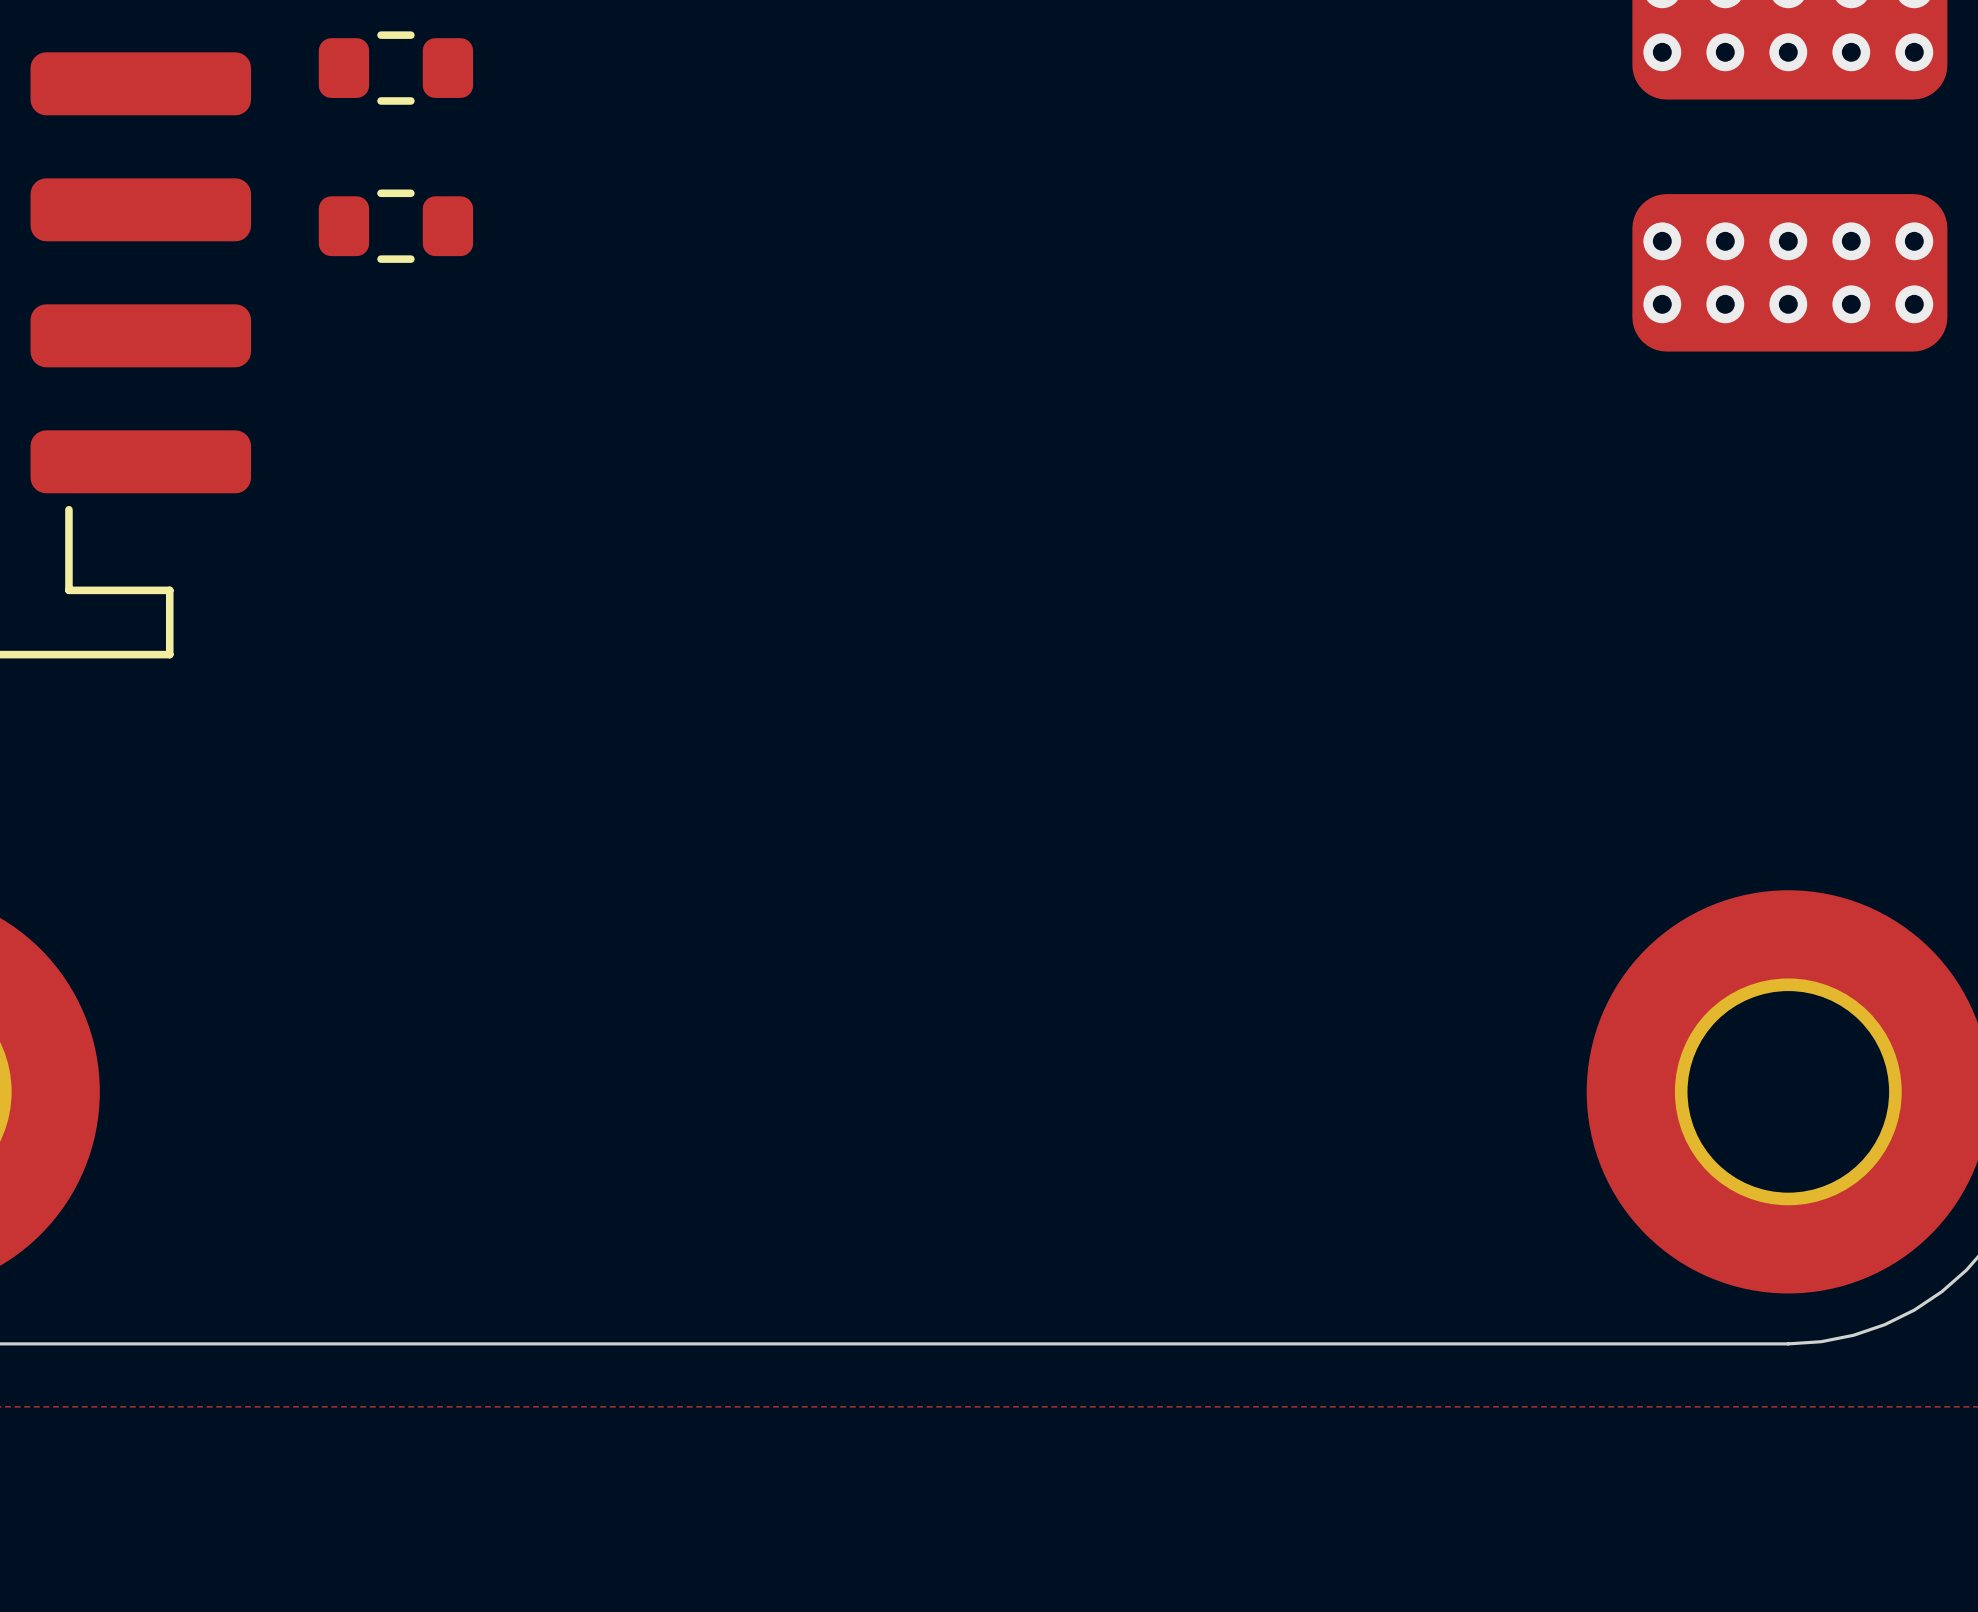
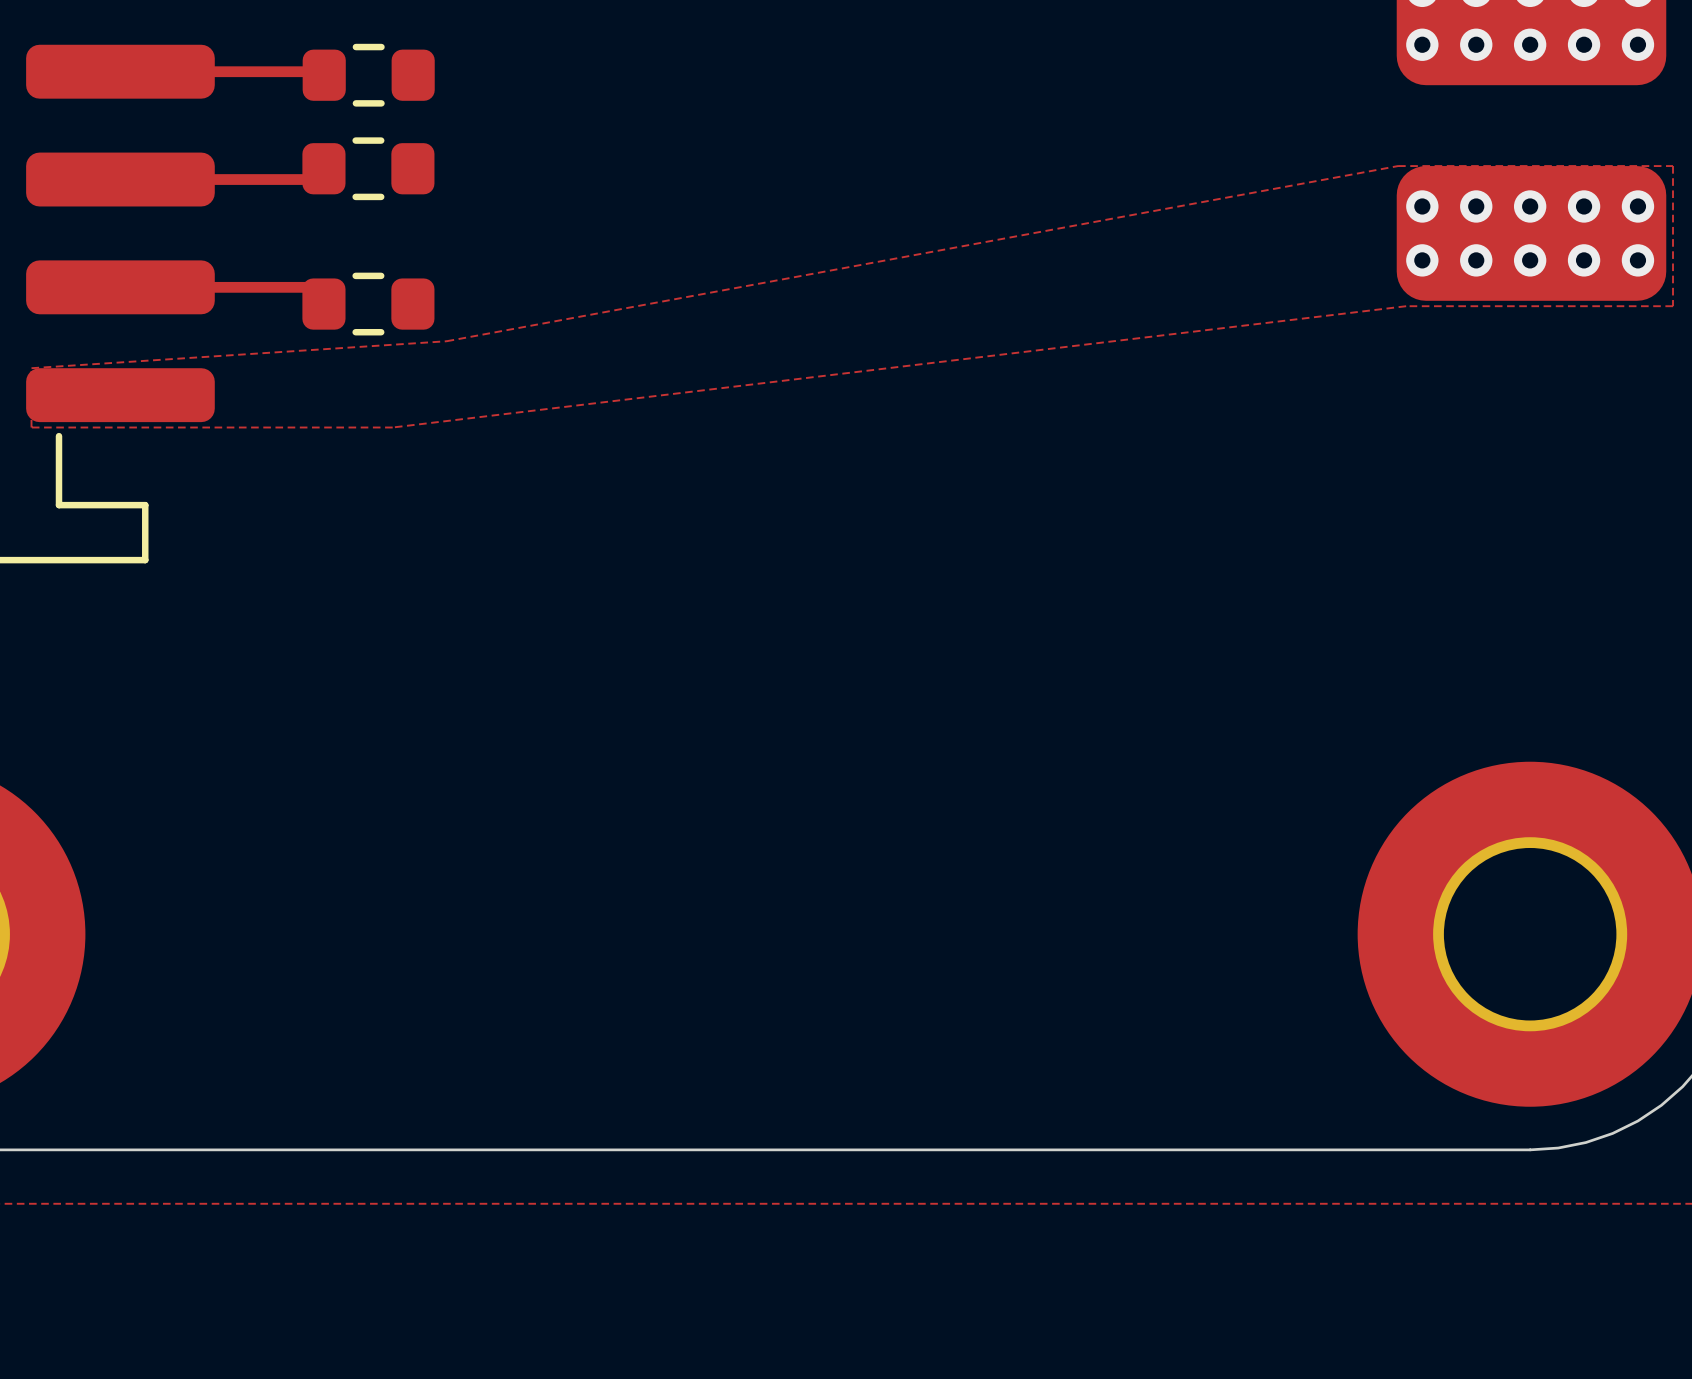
part position: (395, 68) -> (368, 75)
track: none -> (125, 71) (320, 71) (324, 75)
zone outline: none -> (1398, 166) (446, 341) (31, 368) (31, 427) (392, 427) (1406, 306) (1673, 306) (1673, 166) (1398, 166)
track: none -> (323, 168) (313, 179) (125, 179)
part position: (395, 226) -> (368, 168)
track: none -> (125, 287) (307, 287) (323, 304)
part: none -> (368, 304)

